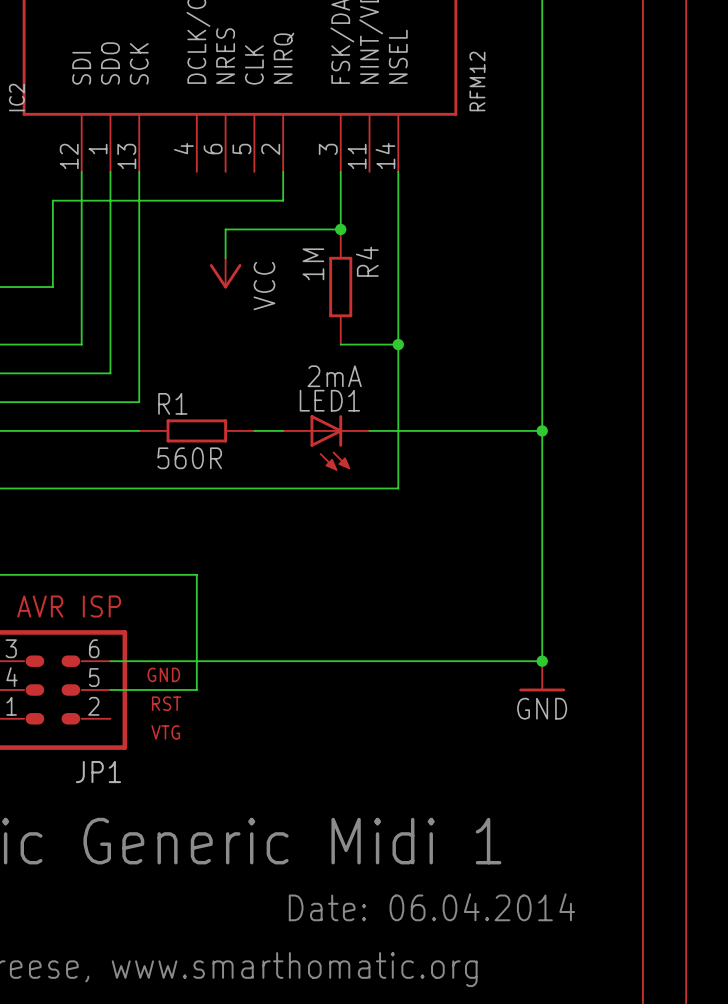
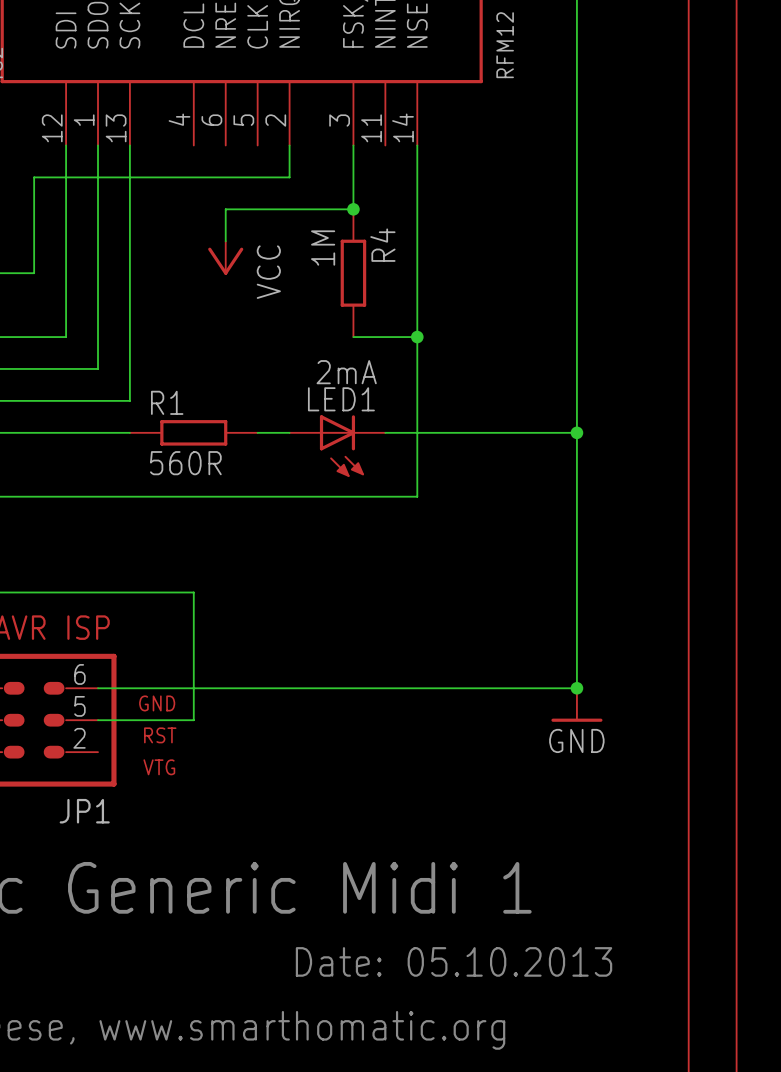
text: Date: 06.04.2014 (431, 907) -> Date: 05.10.2013 (454, 961)

